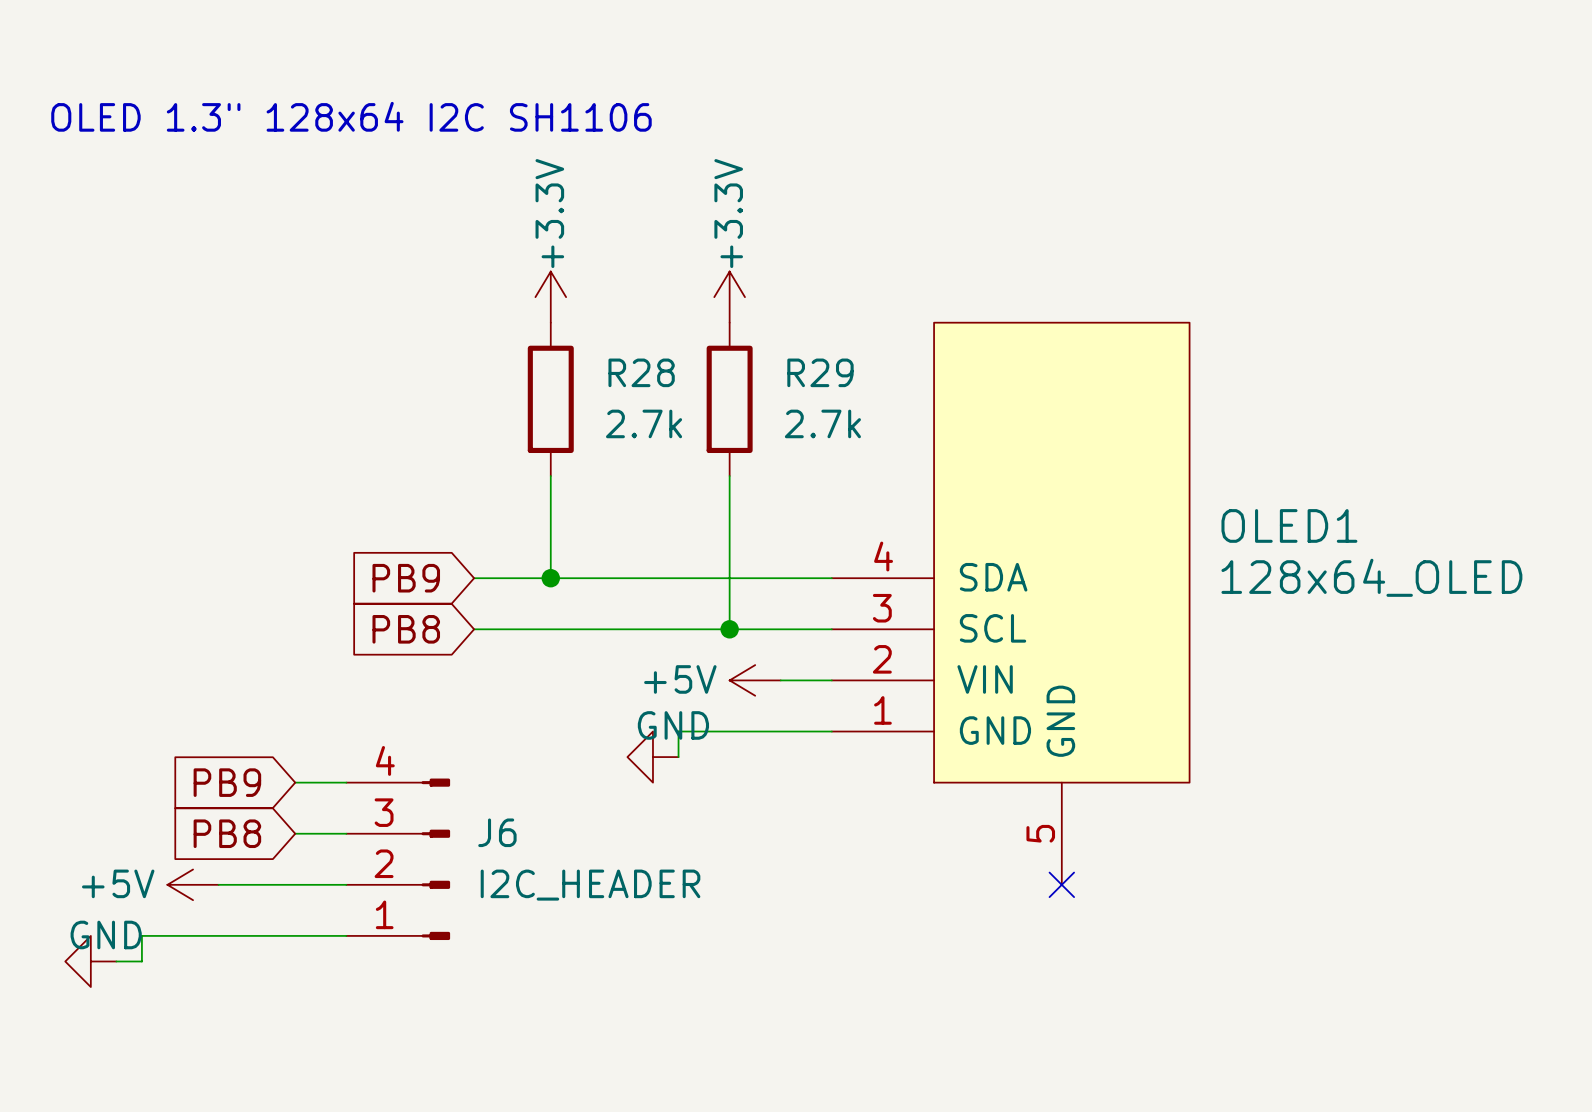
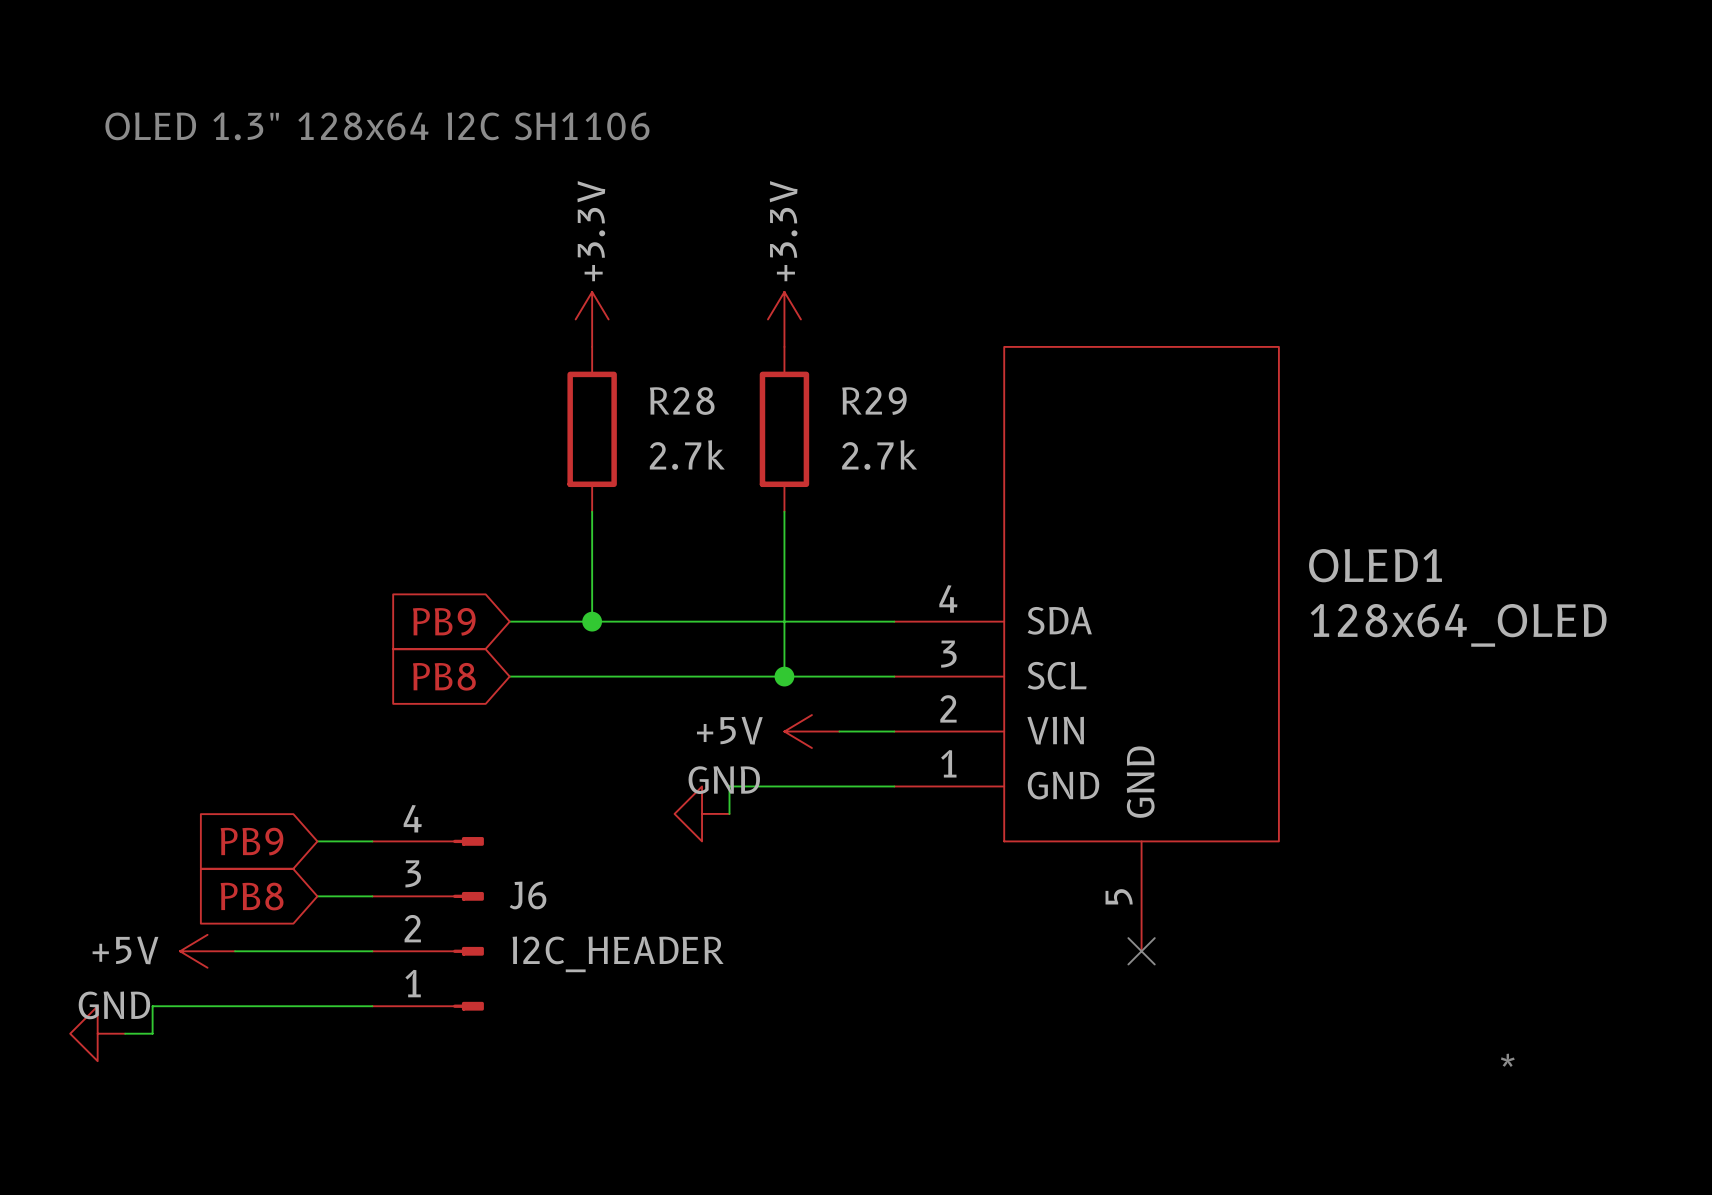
text: none -> * (1507, 1060)

